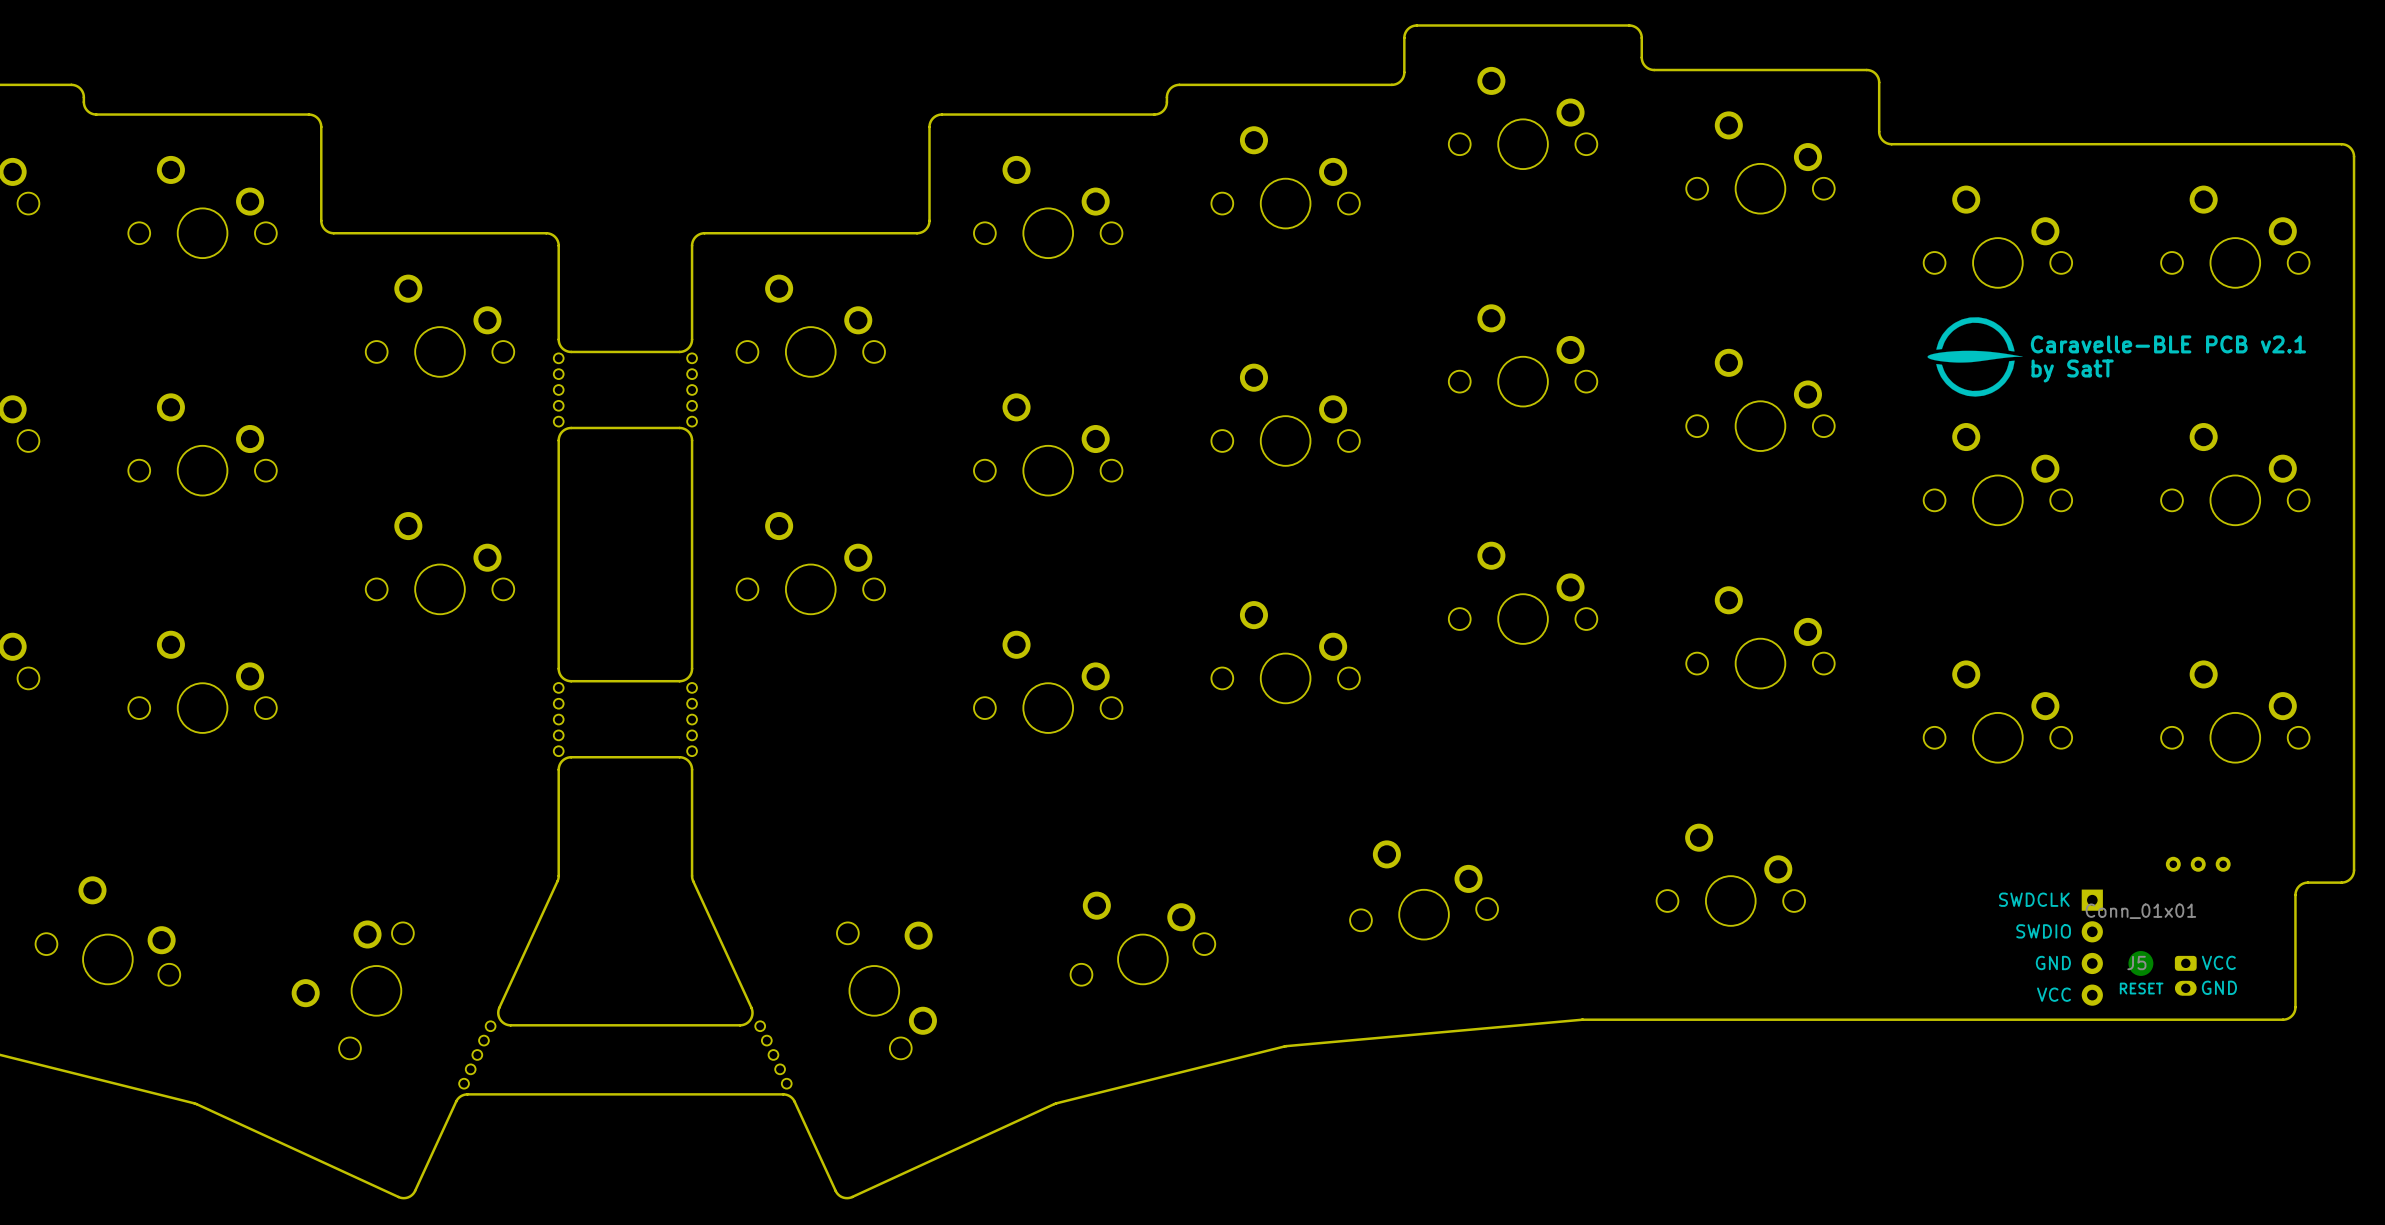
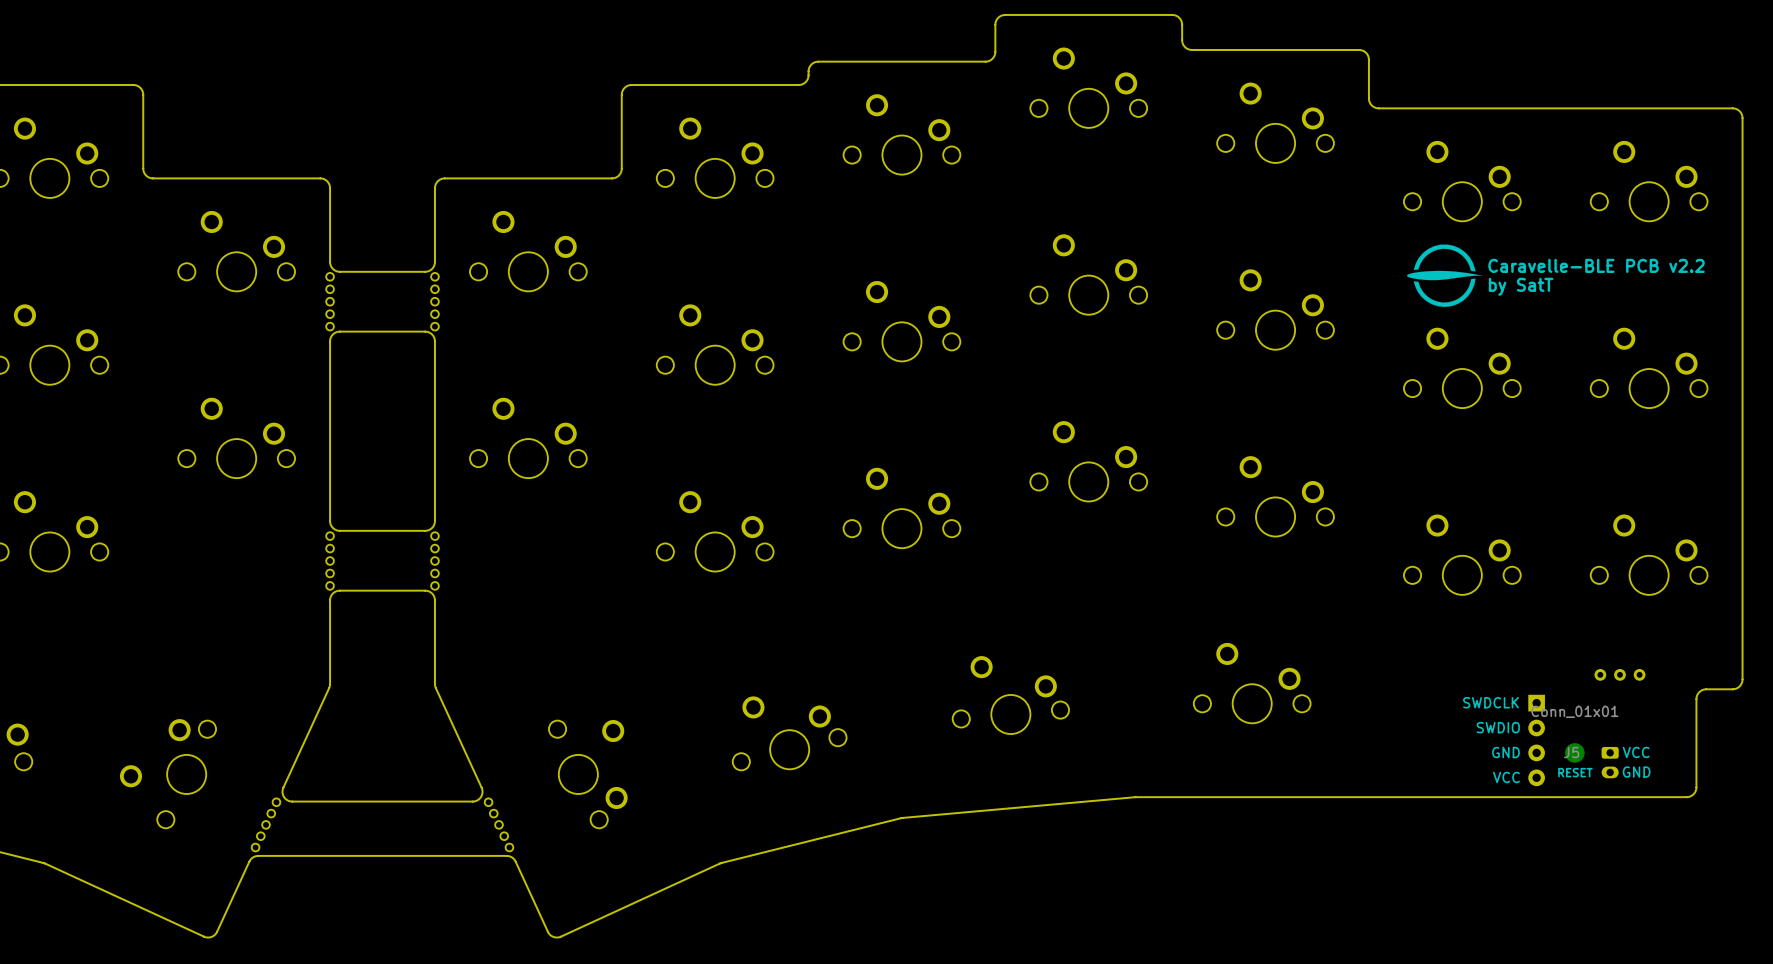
text: Caravelle-BLE PCB v2.1 (2168, 344) -> Caravelle-BLE PCB v2.2 (1596, 265)

